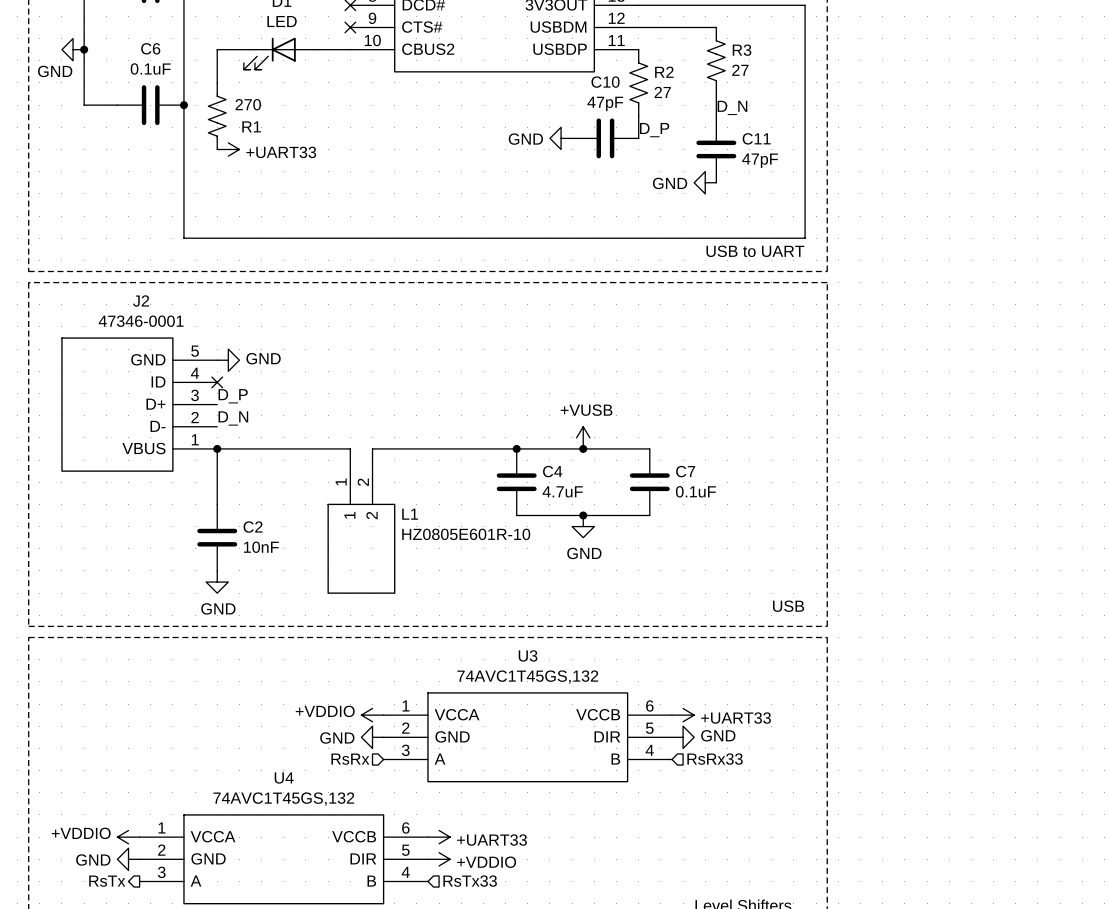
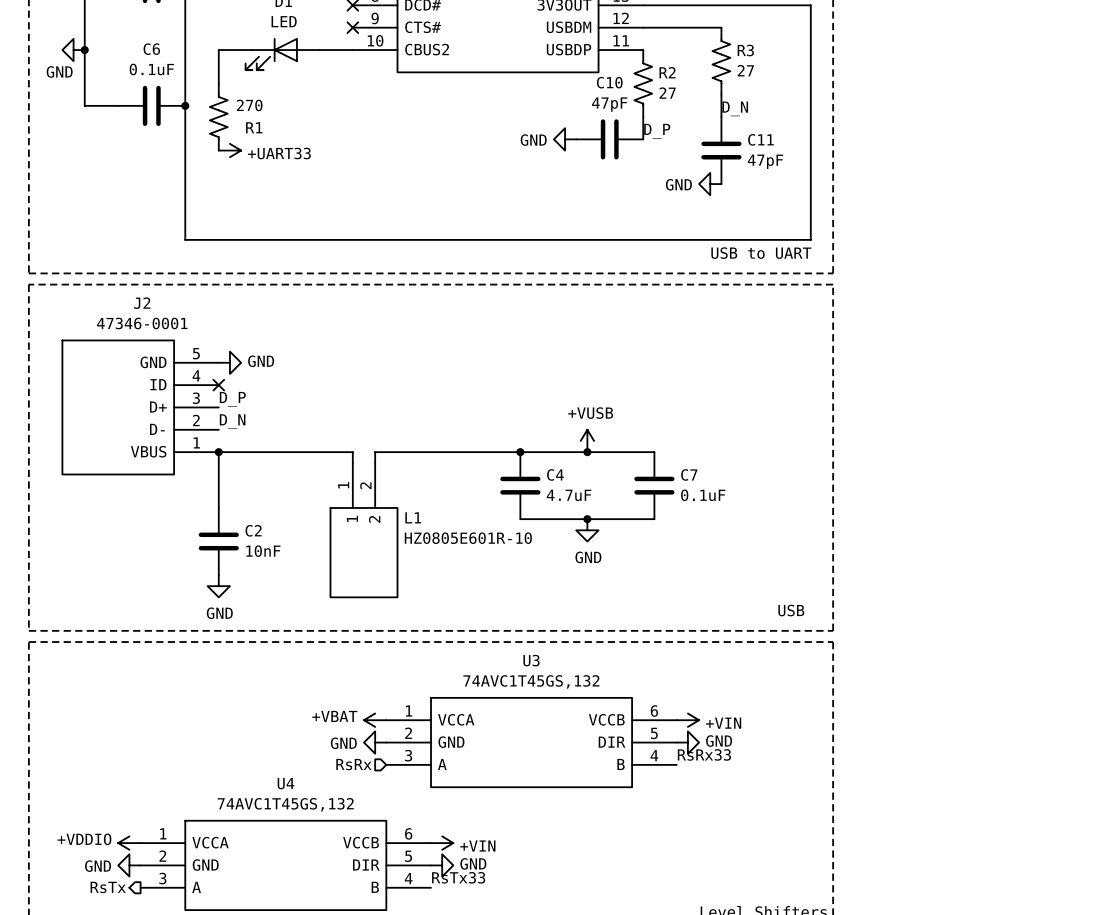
power symbol: +VDDIO (372, 715) -> +VBAT (375, 720)
power symbol: +UART33 (683, 715) -> +VIN (687, 720)
label: none -> RsRx33 (704, 754)
hierarchical label: RsRx33 (715, 759) -> none
power symbol: +UART33 (439, 837) -> +VIN (442, 843)
power symbol: +VDDIO (439, 859) -> GND (442, 865)
label: none -> RsTx33 (458, 877)
hierarchical label: RsTx33 (470, 881) -> none

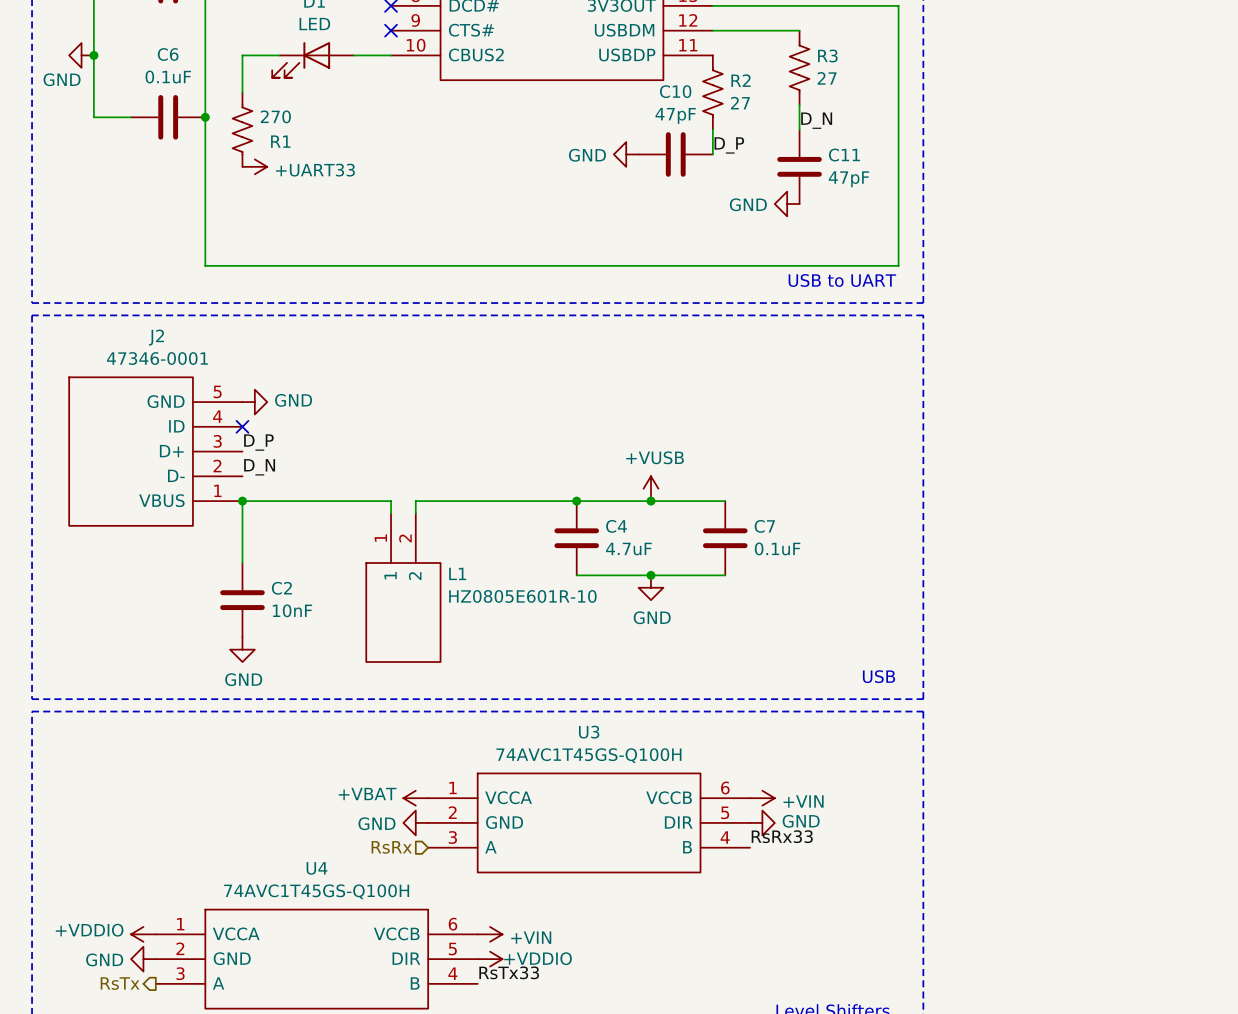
U3 value: 74AVC1T45GS,132 (531, 681) -> 74AVC1T45GS-Q100H (588, 755)
U4 value: 74AVC1T45GS,132 (285, 804) -> 74AVC1T45GS-Q100H (316, 891)
power symbol: GND (442, 865) -> +VDDIO (490, 959)

